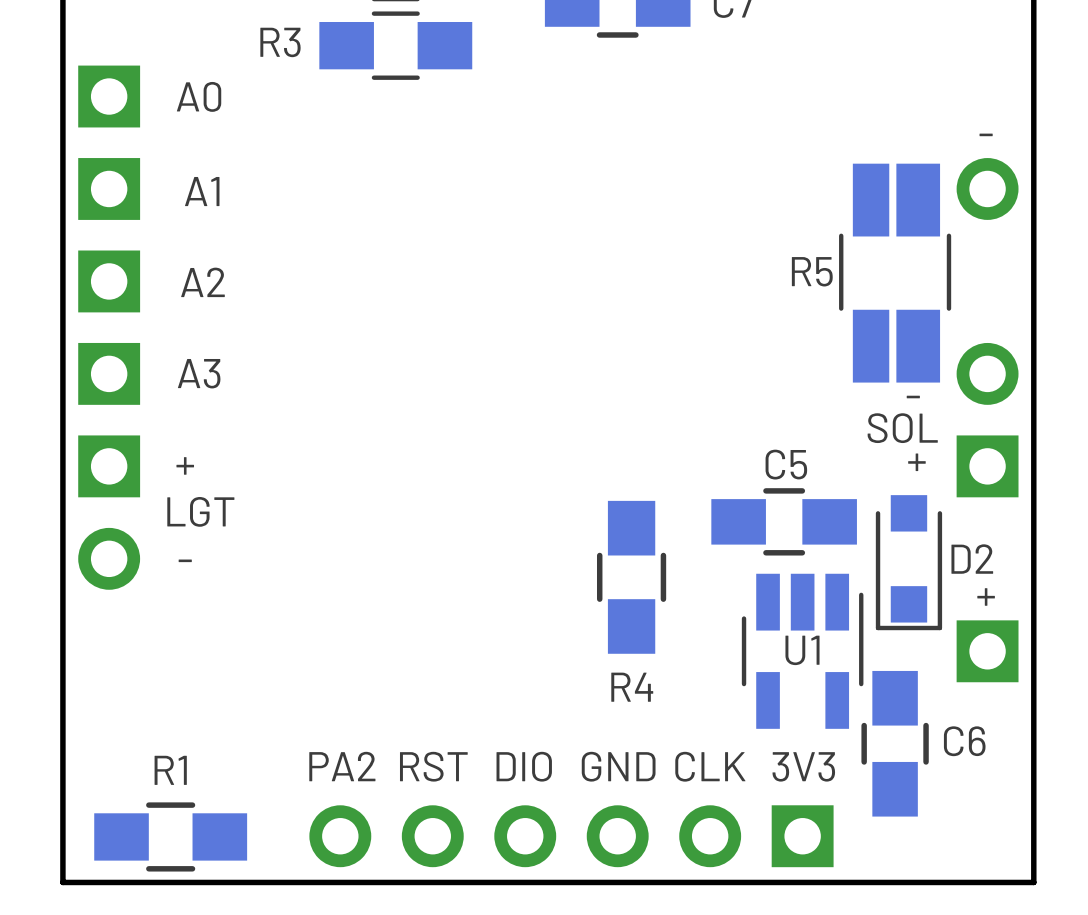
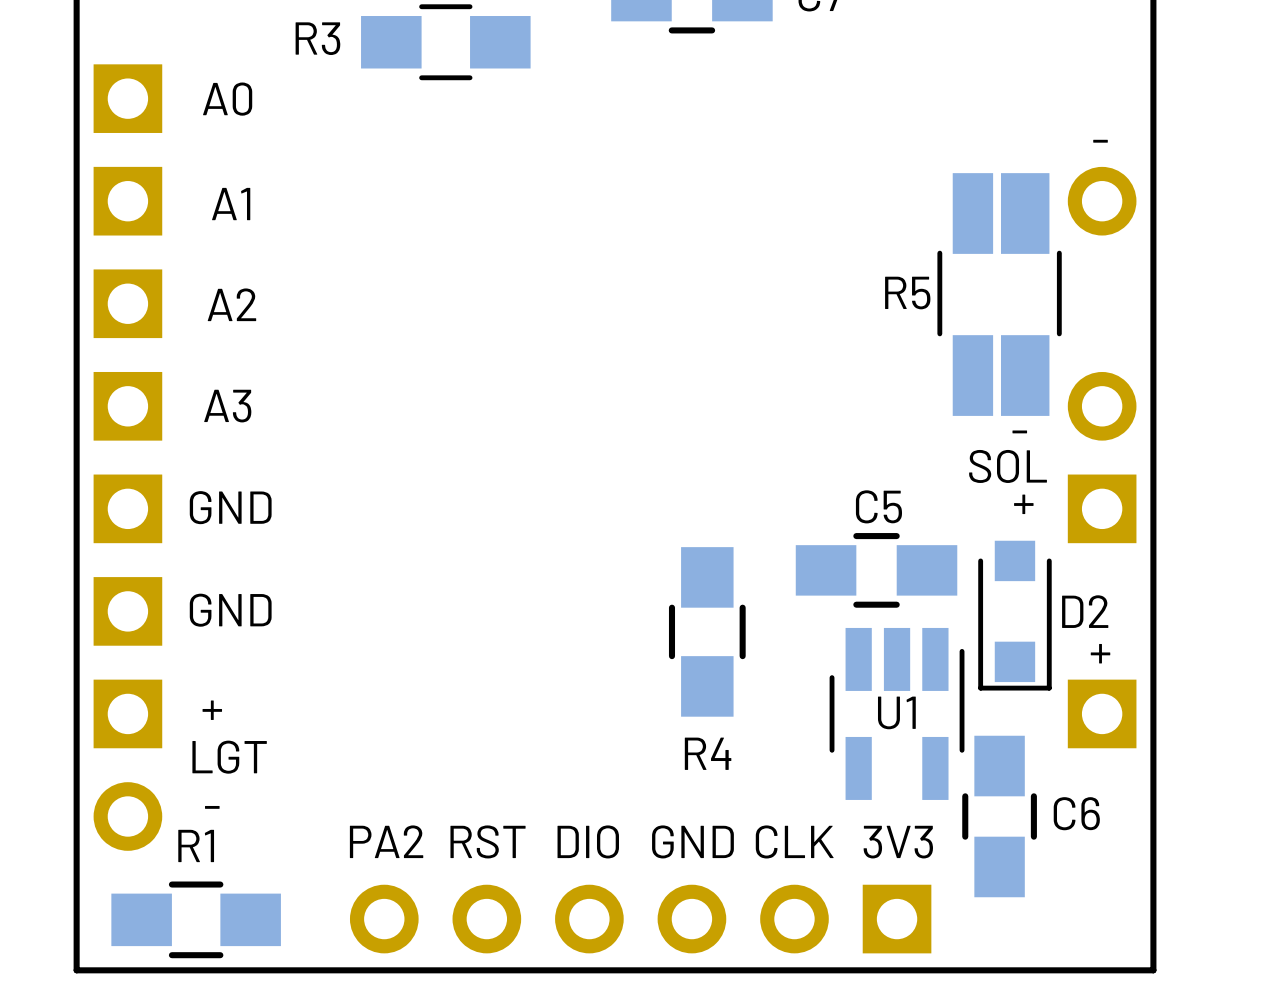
text: + (185, 465) -> GND (230, 507)
text position: LGT (200, 511) -> LGT (229, 757)
part position: (109, 512) -> (127, 765)
part: none -> (127, 611)
text: - (185, 560) -> GND (230, 610)
text: none -> + (212, 710)
text: none -> - (212, 807)

